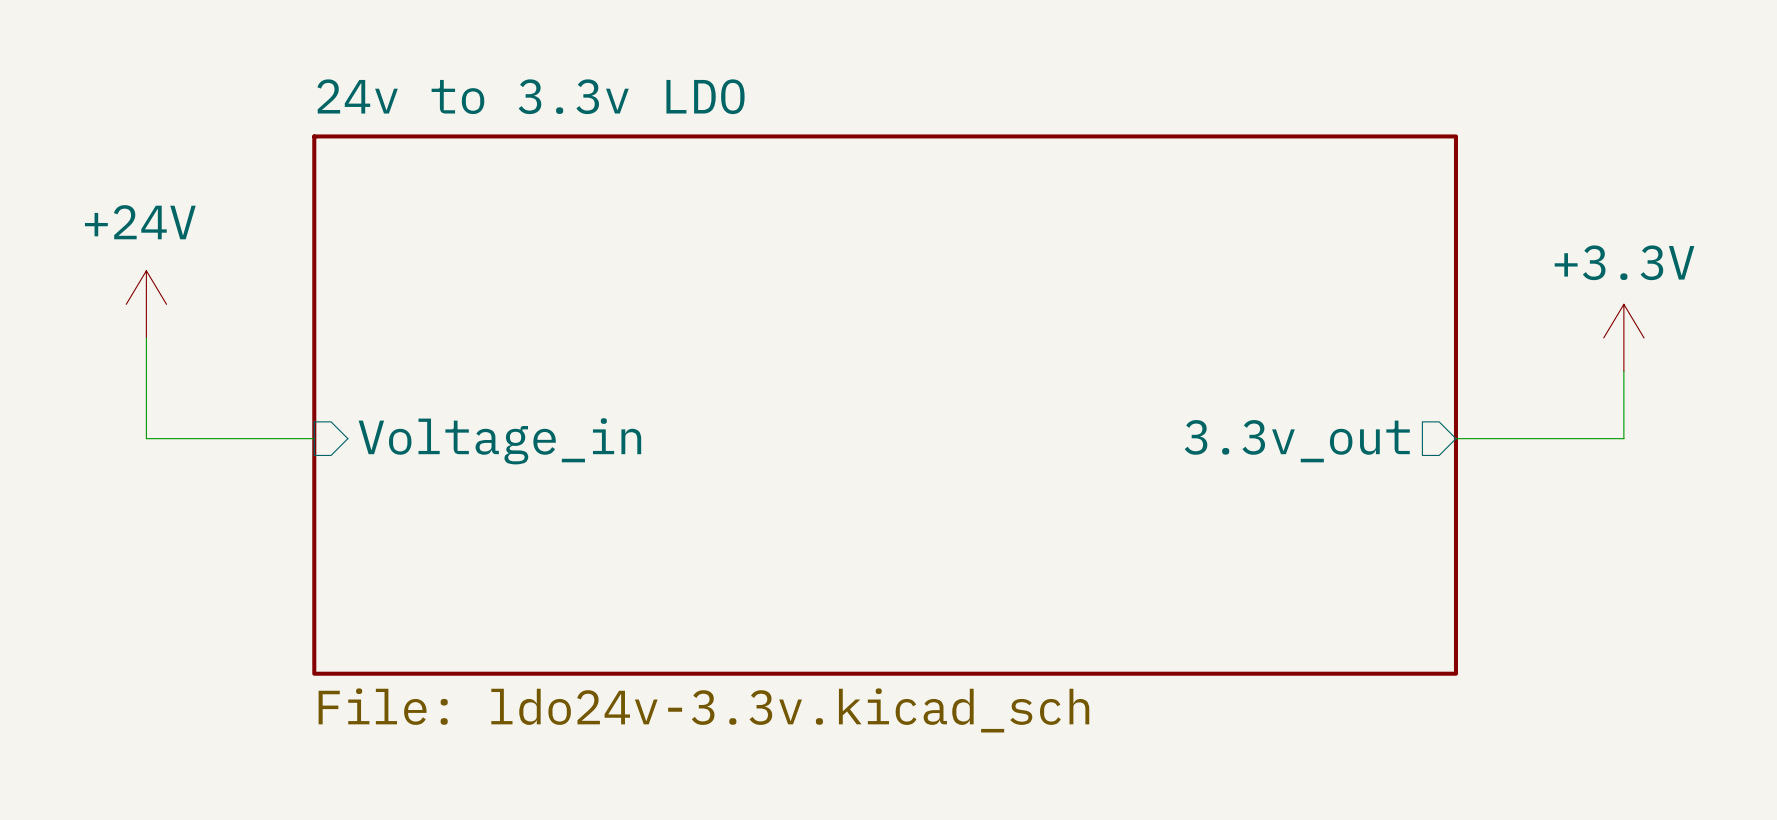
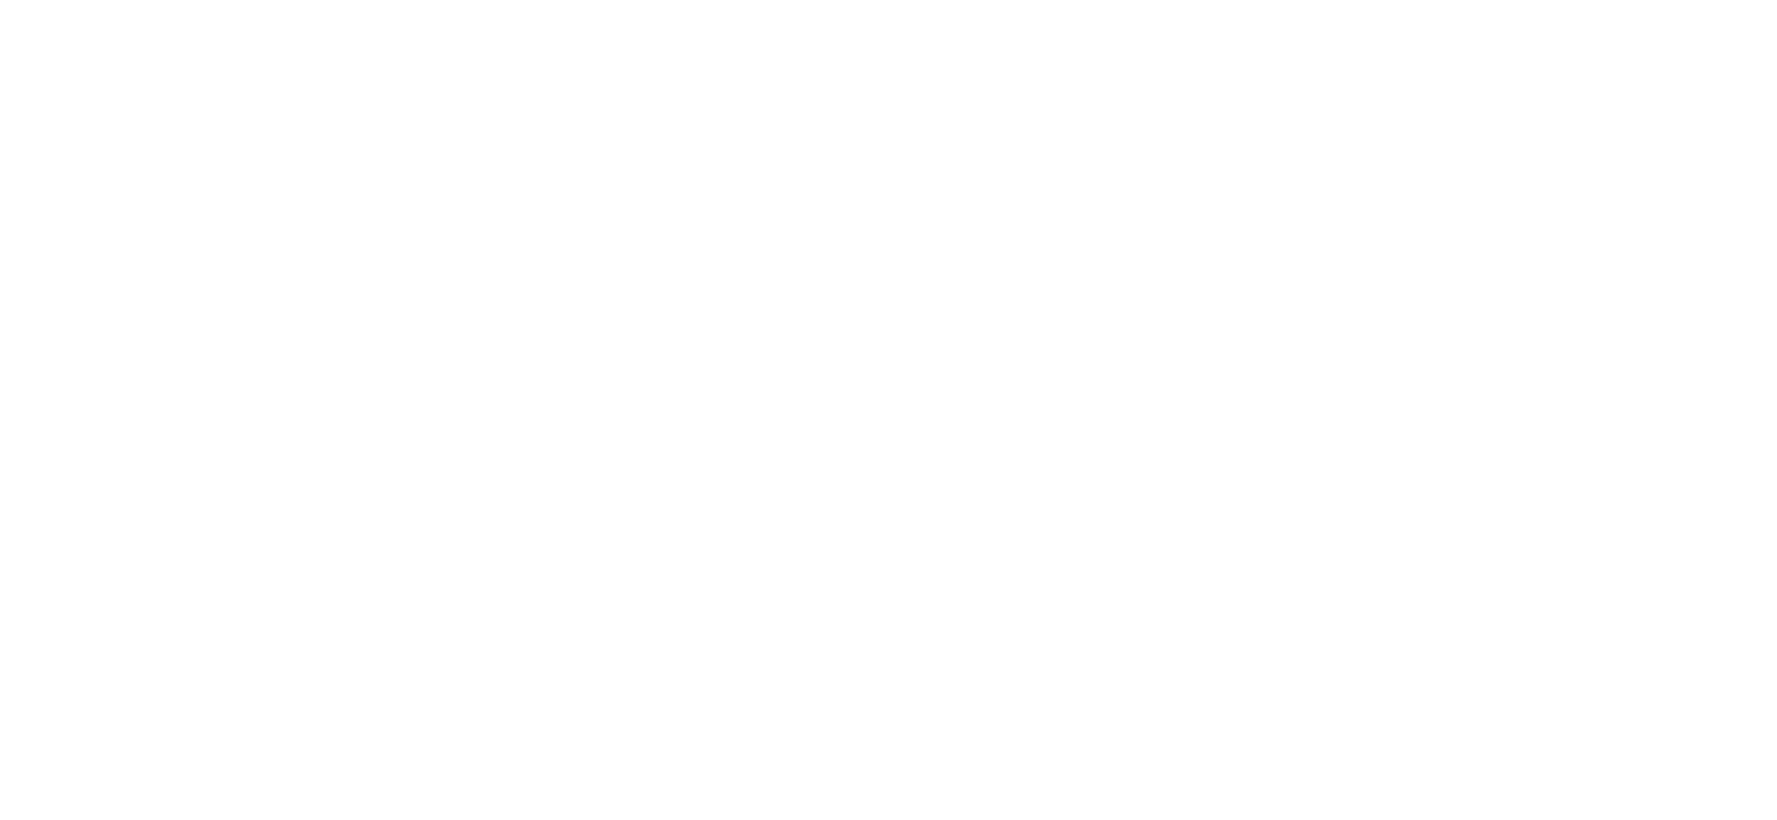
power symbol: +24V (146, 304) -> none
wire: (146, 337) (146, 438) (314, 438) -> none
power symbol: +3.3V (1623, 337) -> none
wire: (1623, 371) (1623, 438) (1455, 438) -> none
sheet 24v to 3.3v LDO: File: ldo24v-3.3v.kicad_sch (885, 405) -> none
sheet pin: Voltage_in (499, 441) -> none
sheet pin: 3.3v_out (1297, 441) -> none

